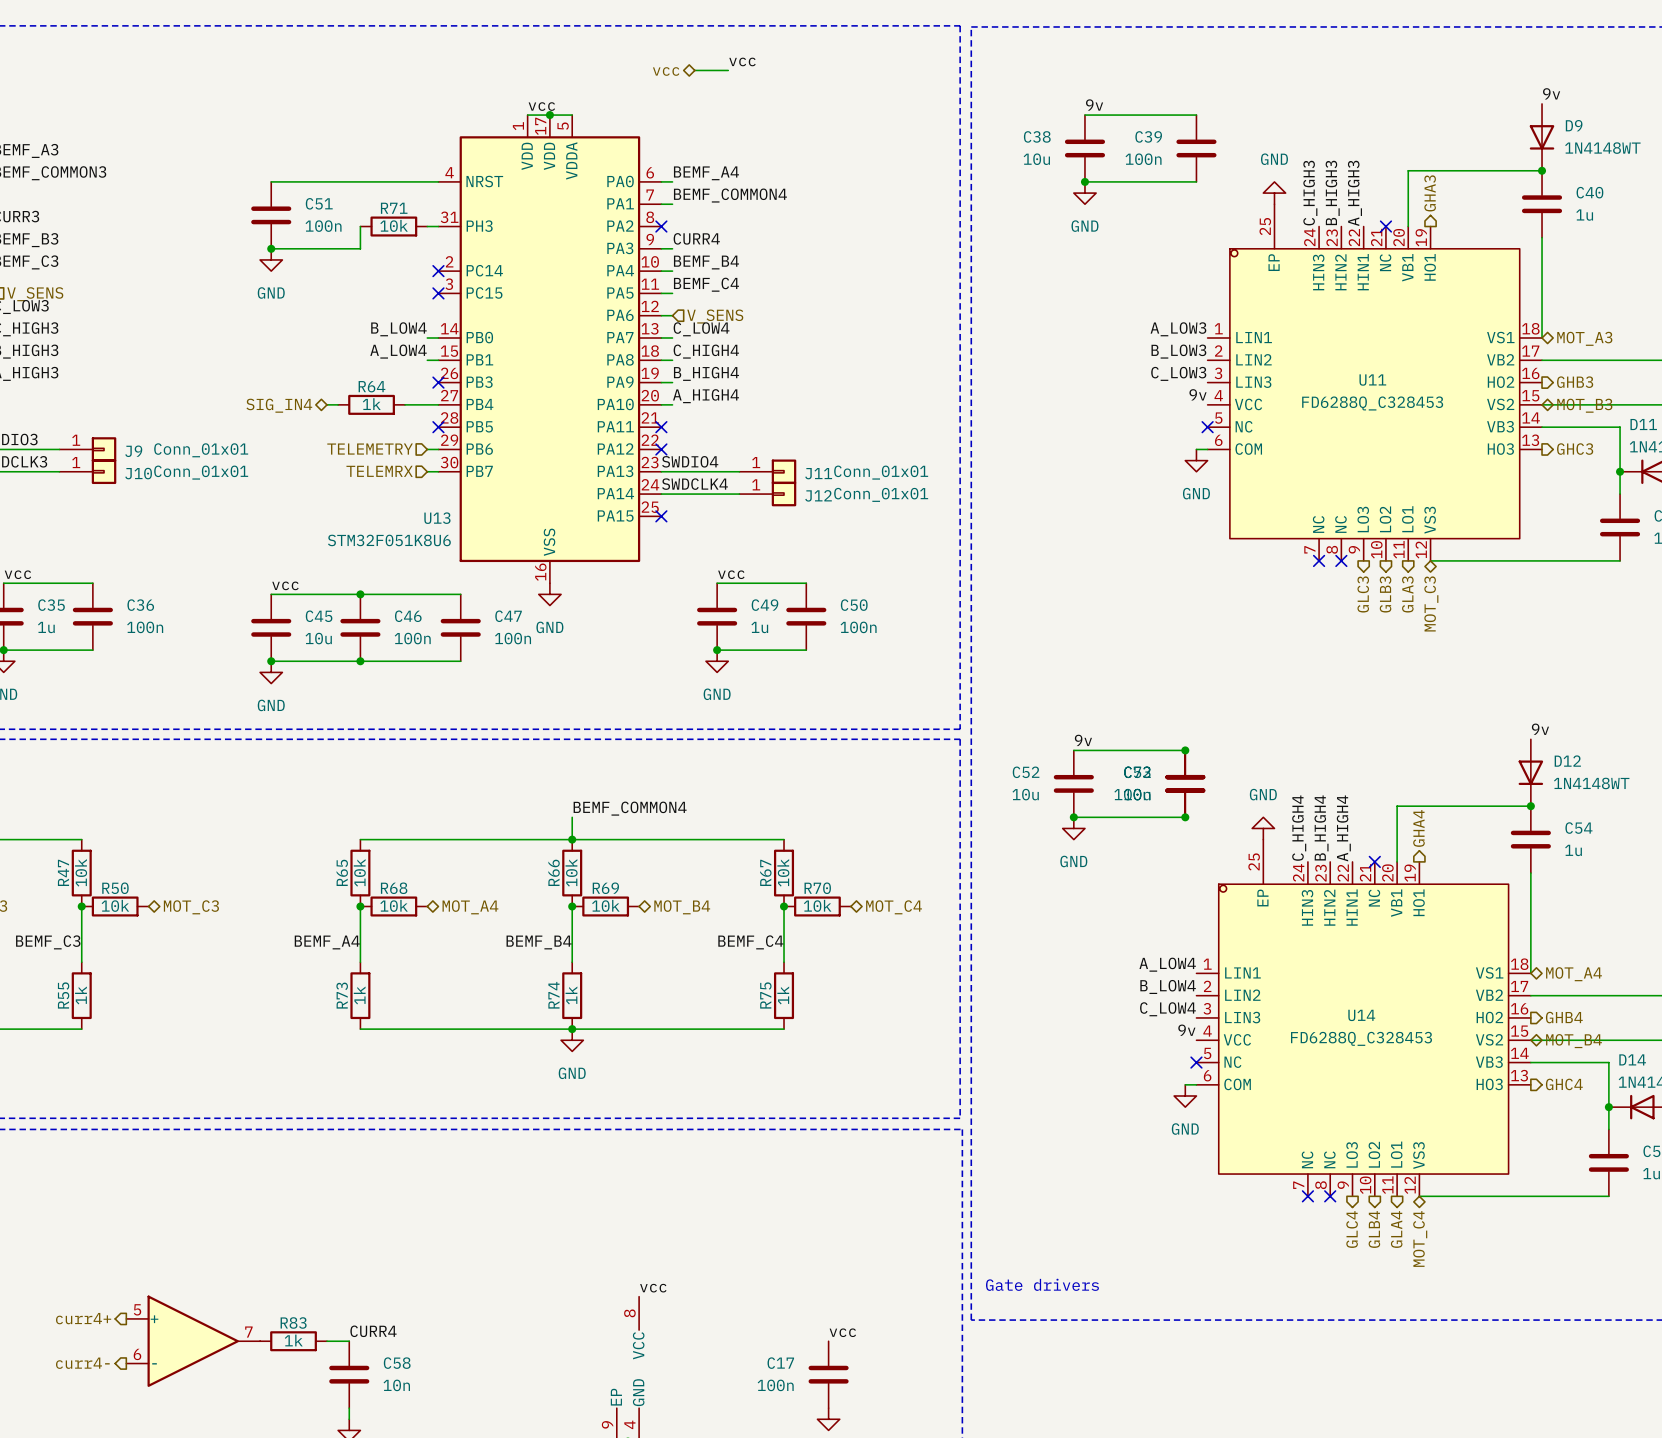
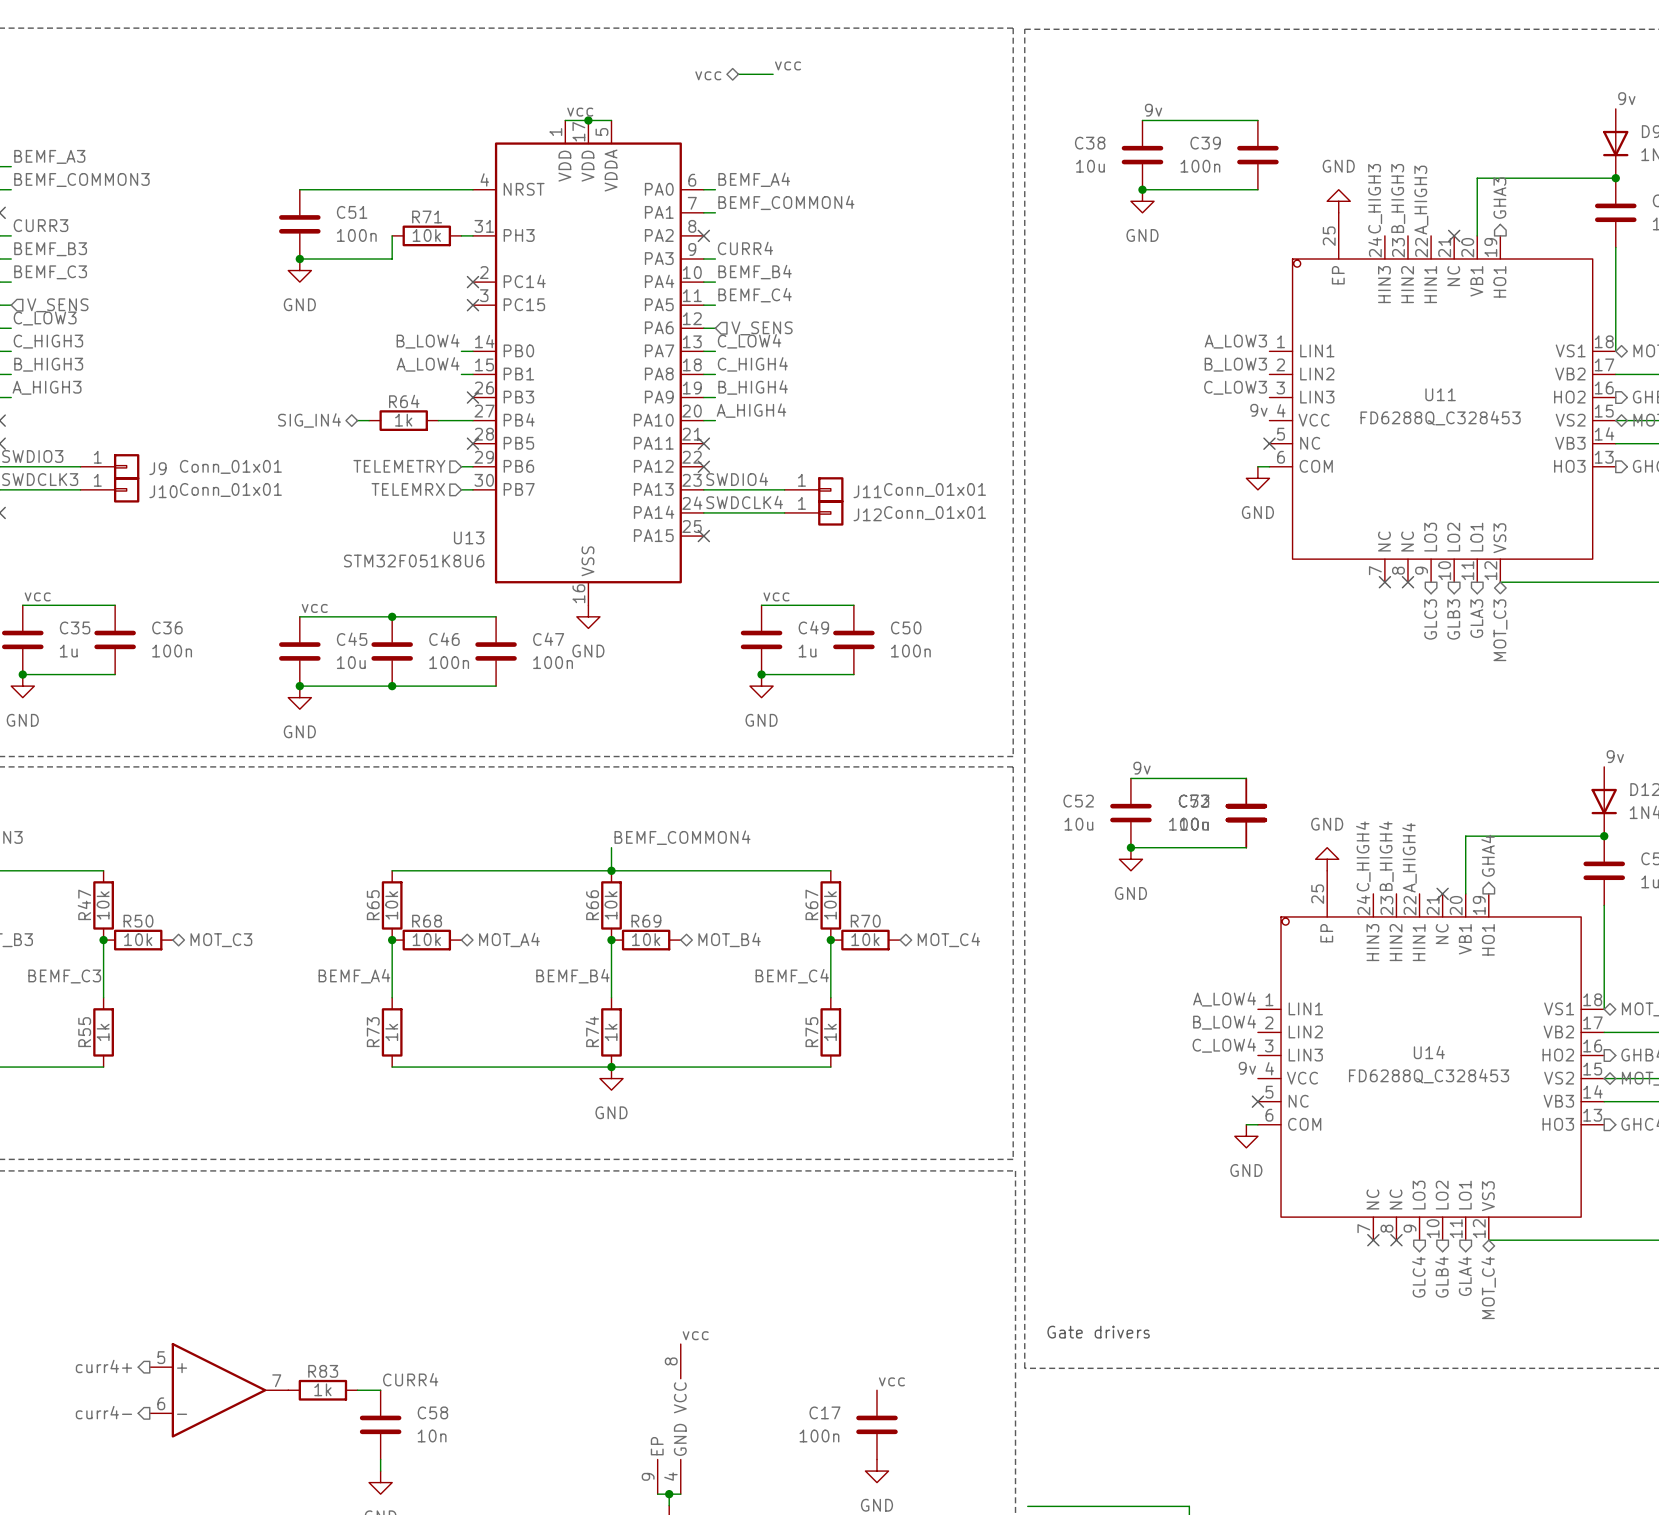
junction: (1185, 750) -> none
junction: (1185, 817) -> none

